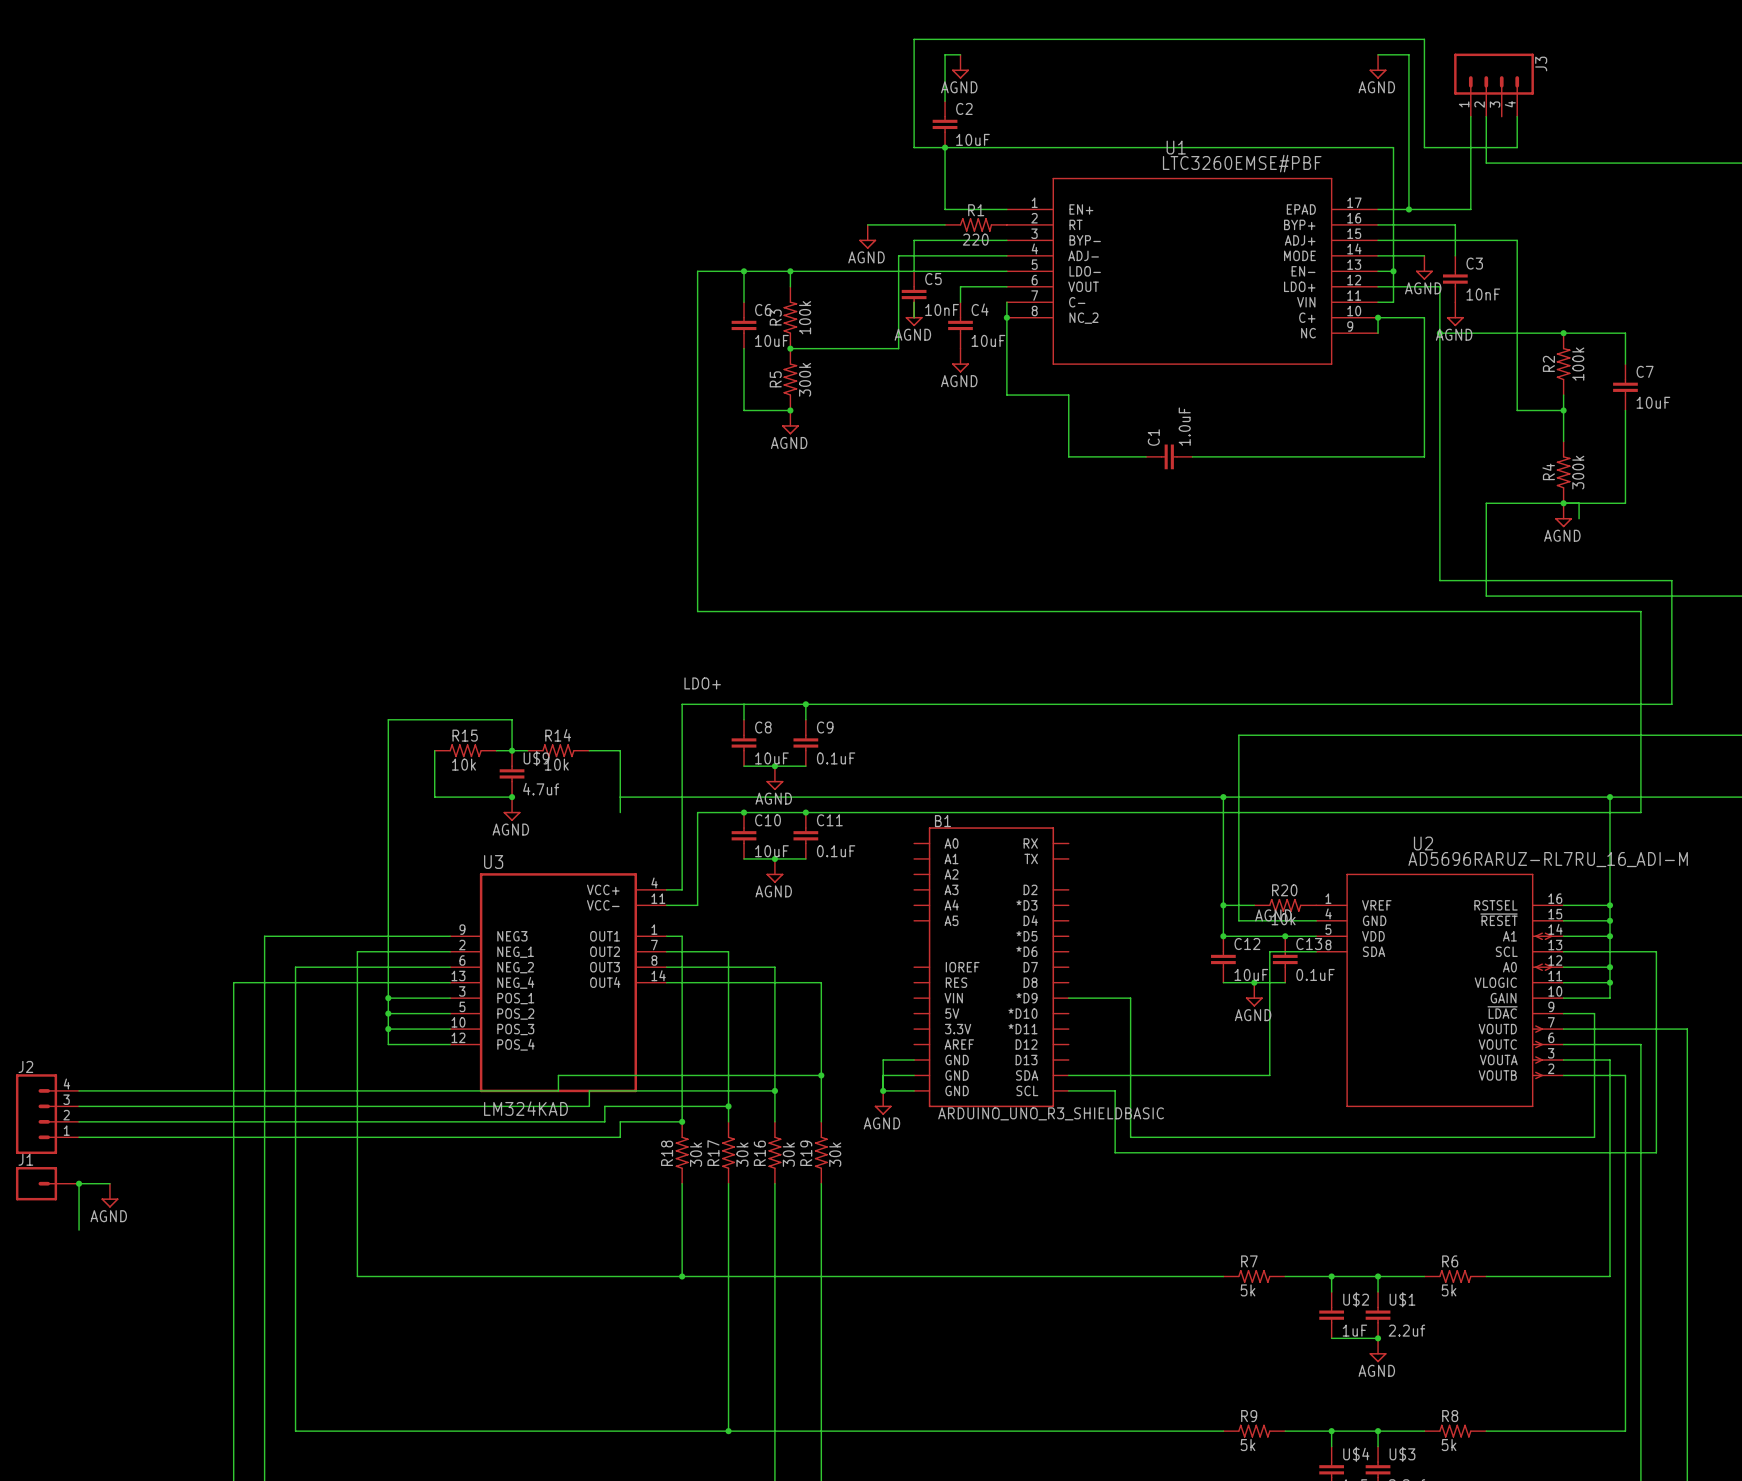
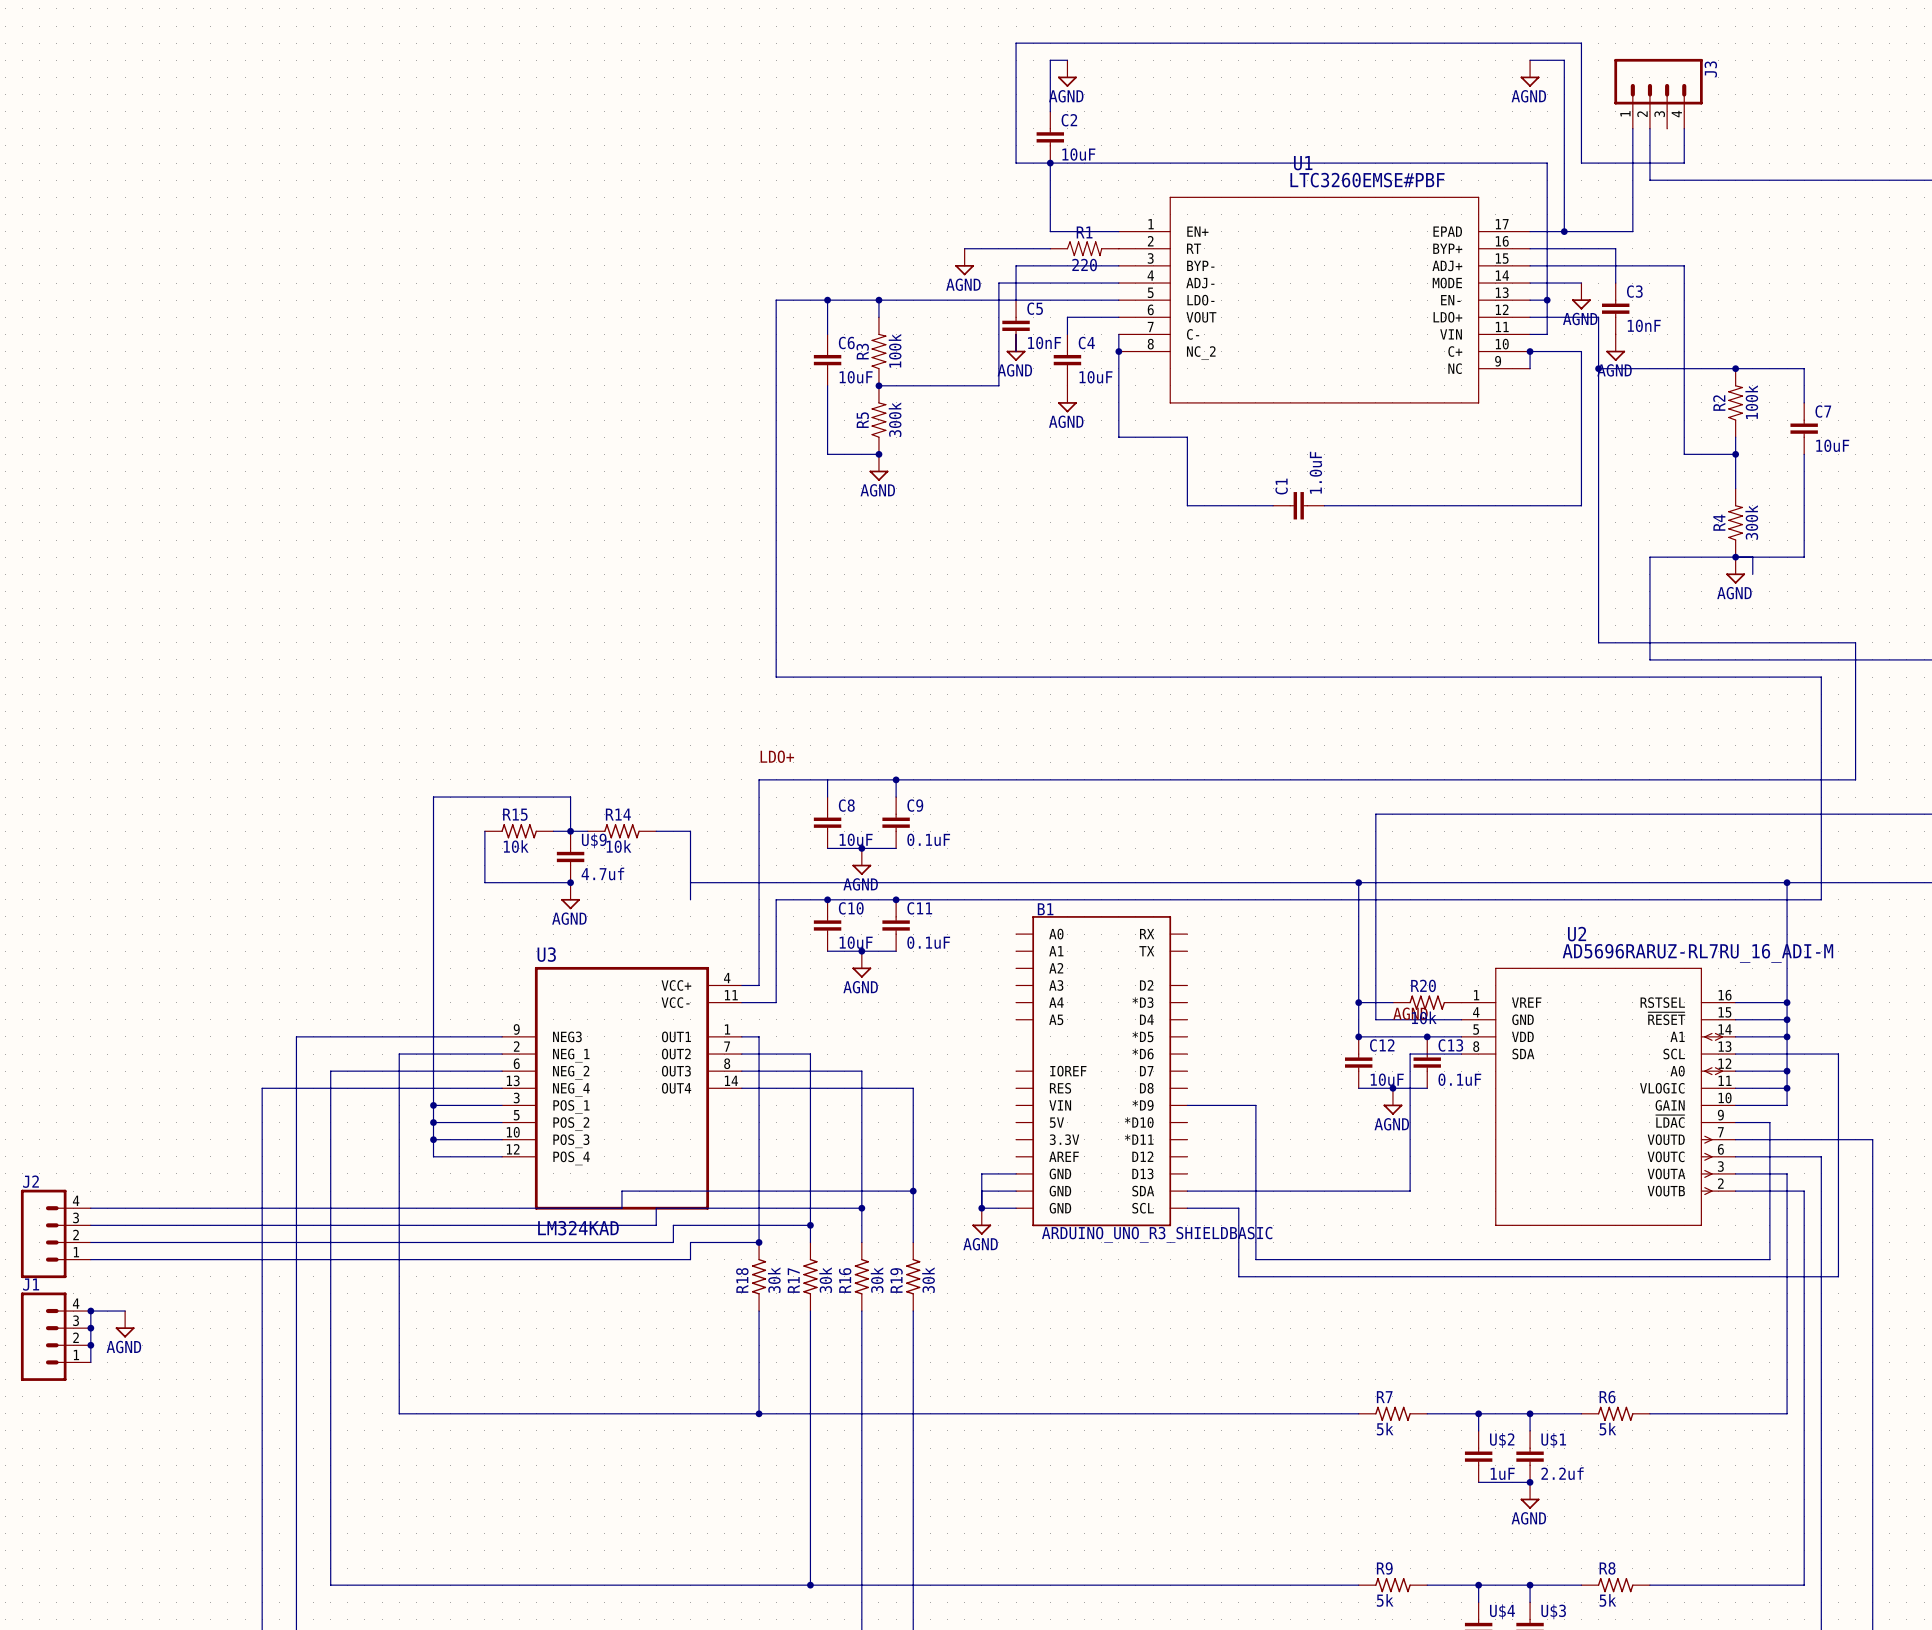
J1 symbol: [15, 1167, 80, 1201] -> [20, 1292, 91, 1381]
junction: none -> (90, 1328)
junction: none -> (90, 1345)

